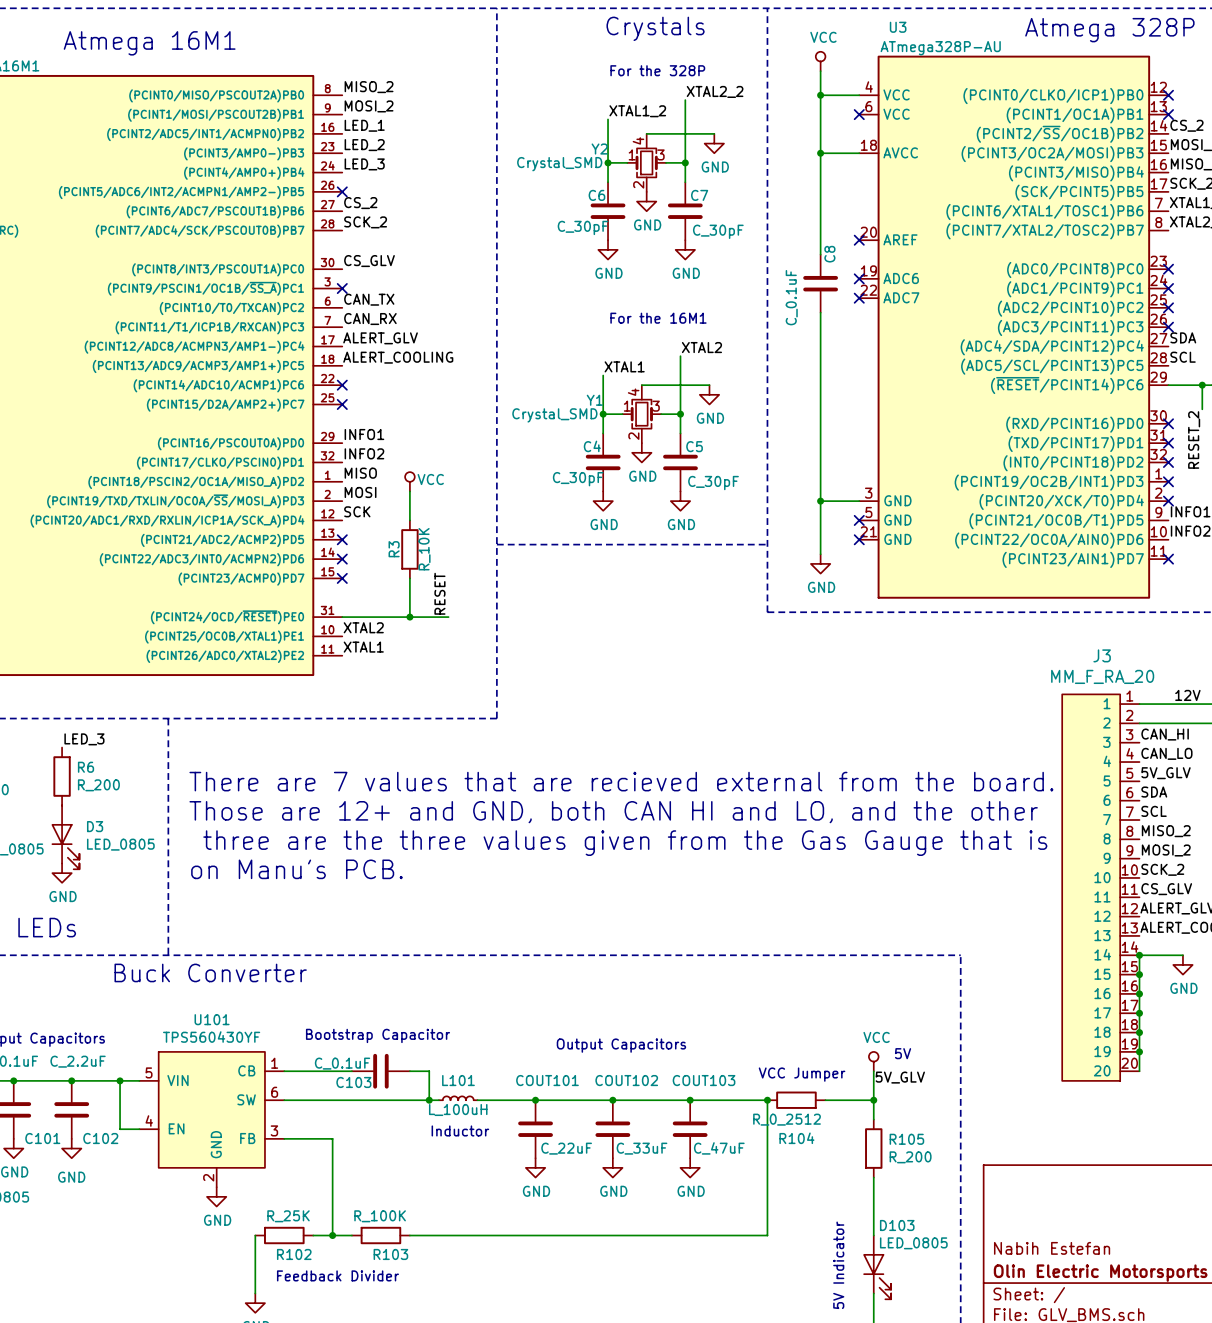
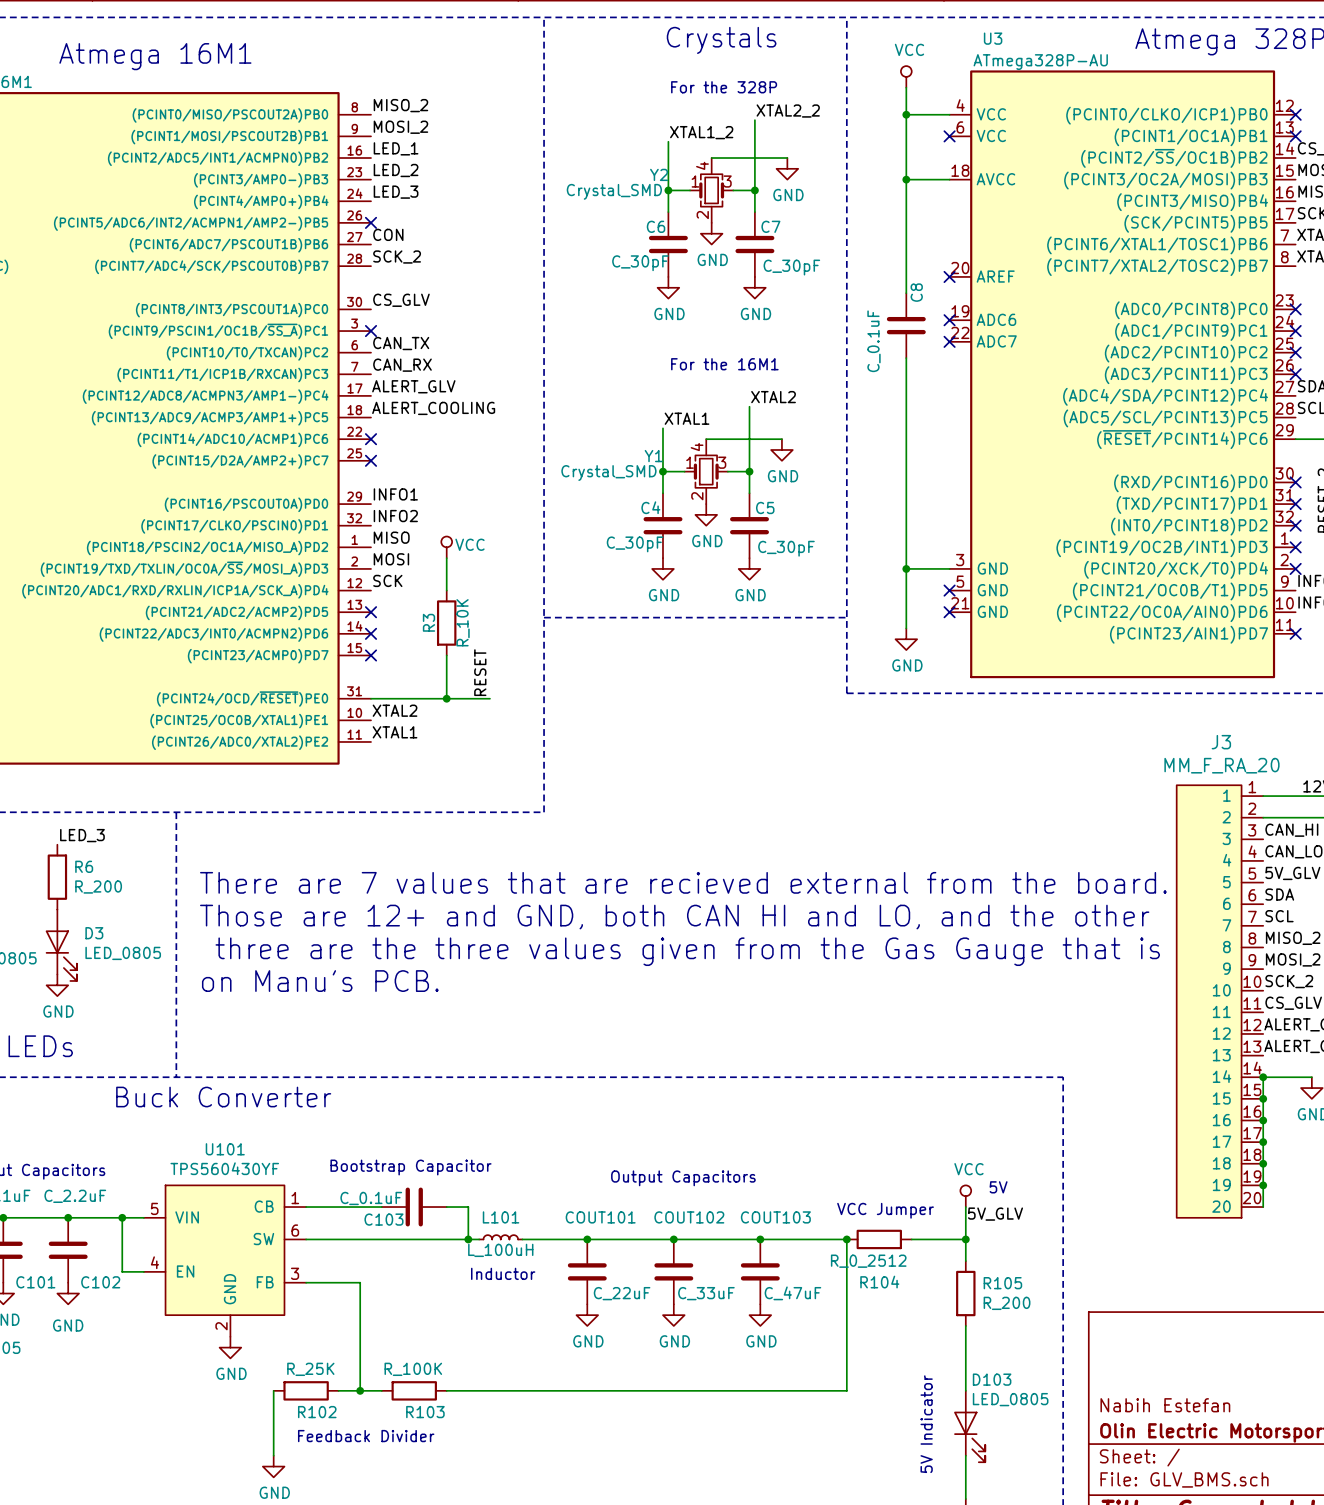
label: CS_2 (360, 203) -> CON (388, 234)

